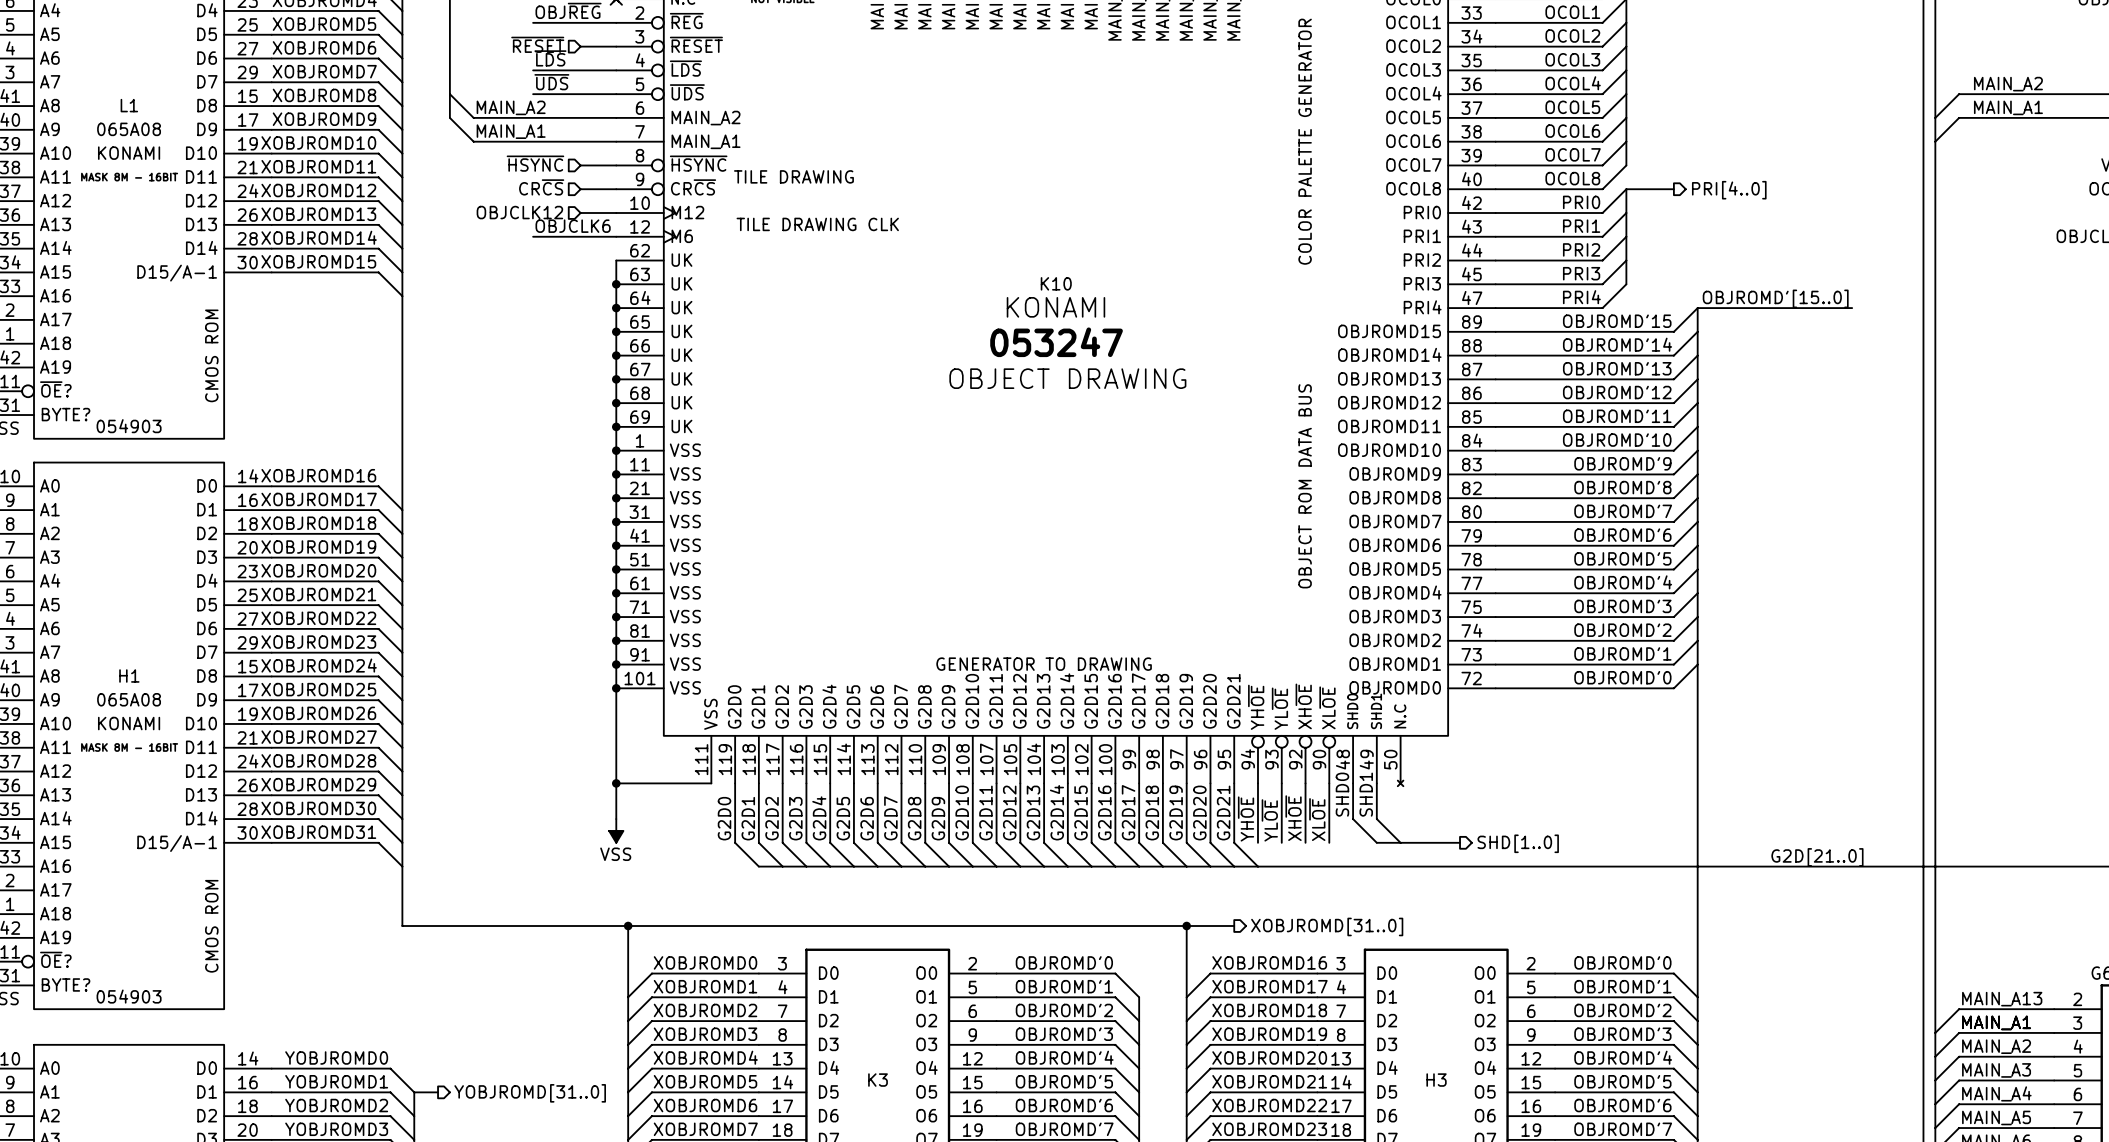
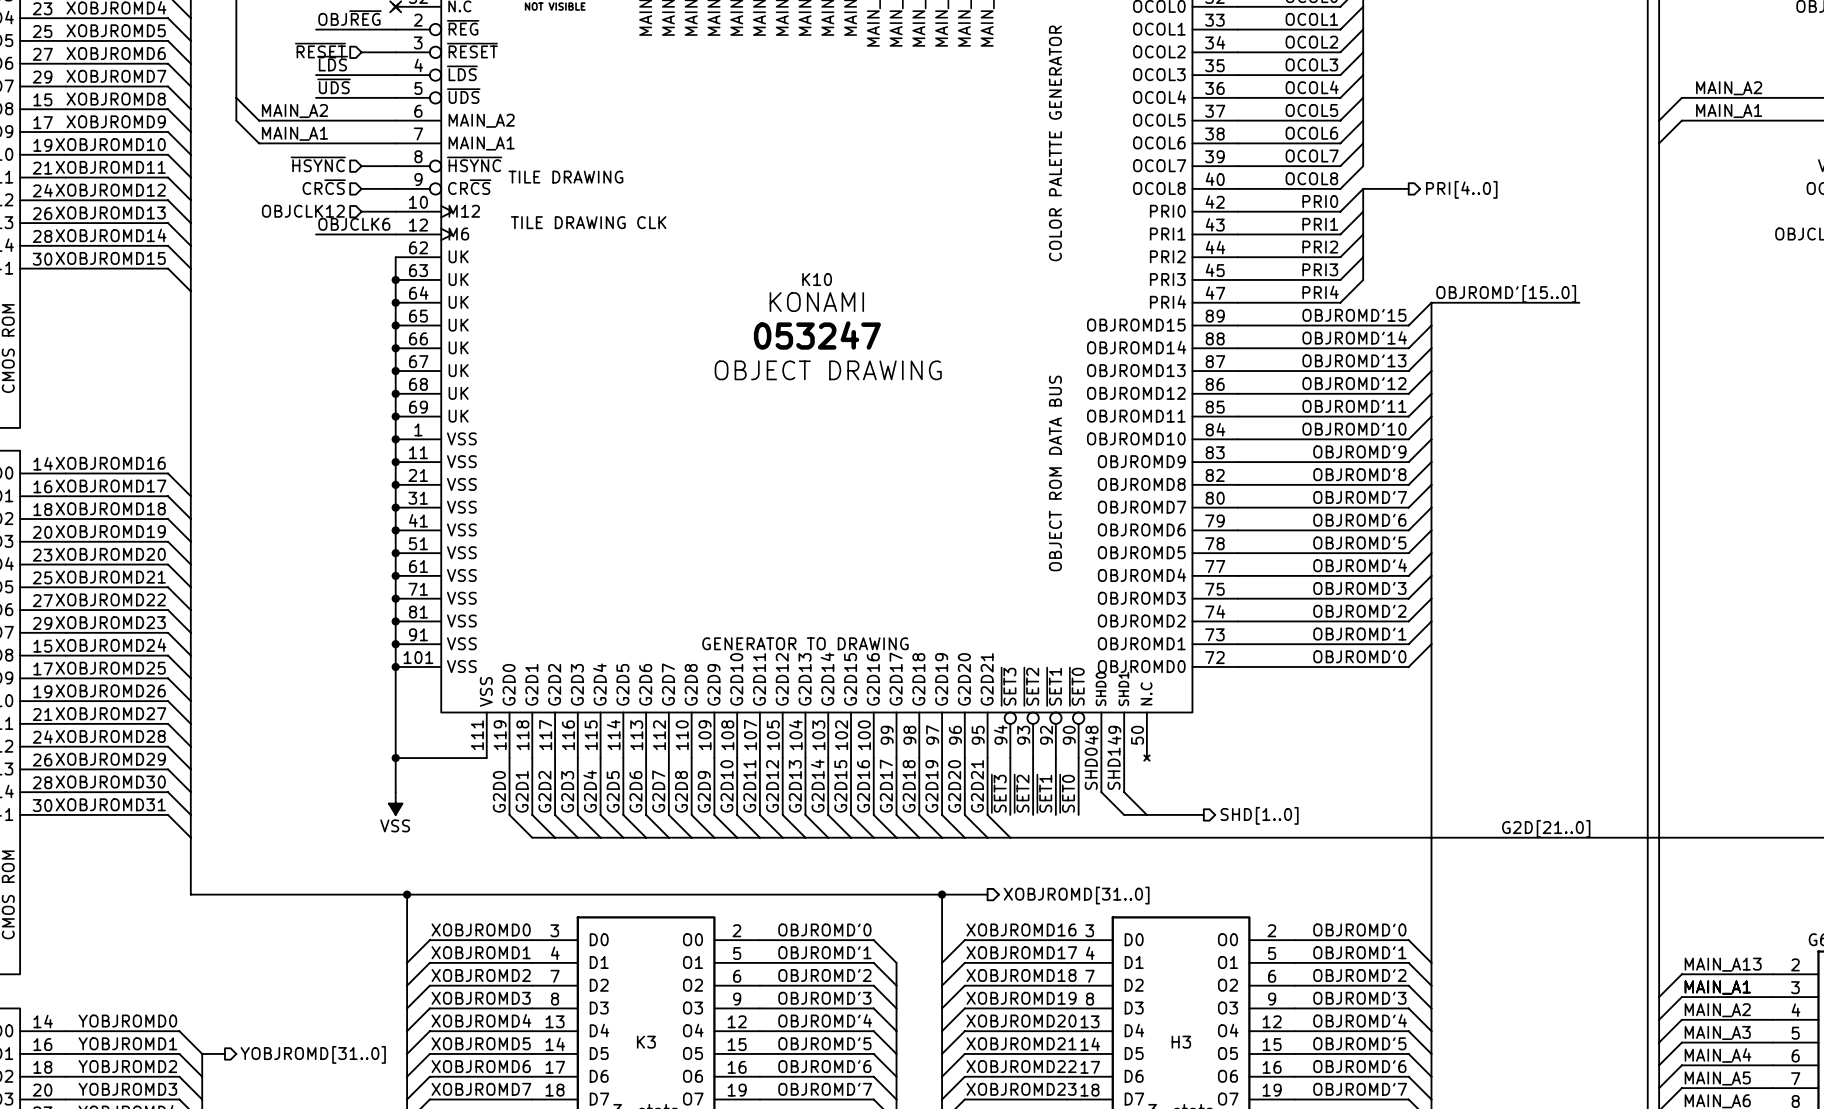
K10 pin name: XH~{OE} (1303, 706) -> ~{SET1} (1054, 686)
K10 pin name: YH~{OE} (1256, 707) -> ~{SET3} (1008, 686)
K10 pin name: XL~{OE} (1327, 707) -> ~{SET0} (1076, 686)
K10 pin name: YL~{OE} (1279, 708) -> ~{SET2} (1031, 686)
label: YH~{OE} (1246, 818) -> ~{SET3} (998, 793)
label: XH~{OE} (1293, 818) -> ~{SET1} (1044, 793)
label: XL~{OE} (1317, 819) -> ~{SET0} (1067, 793)
label: YL~{OE} (1269, 820) -> ~{SET2} (1021, 793)

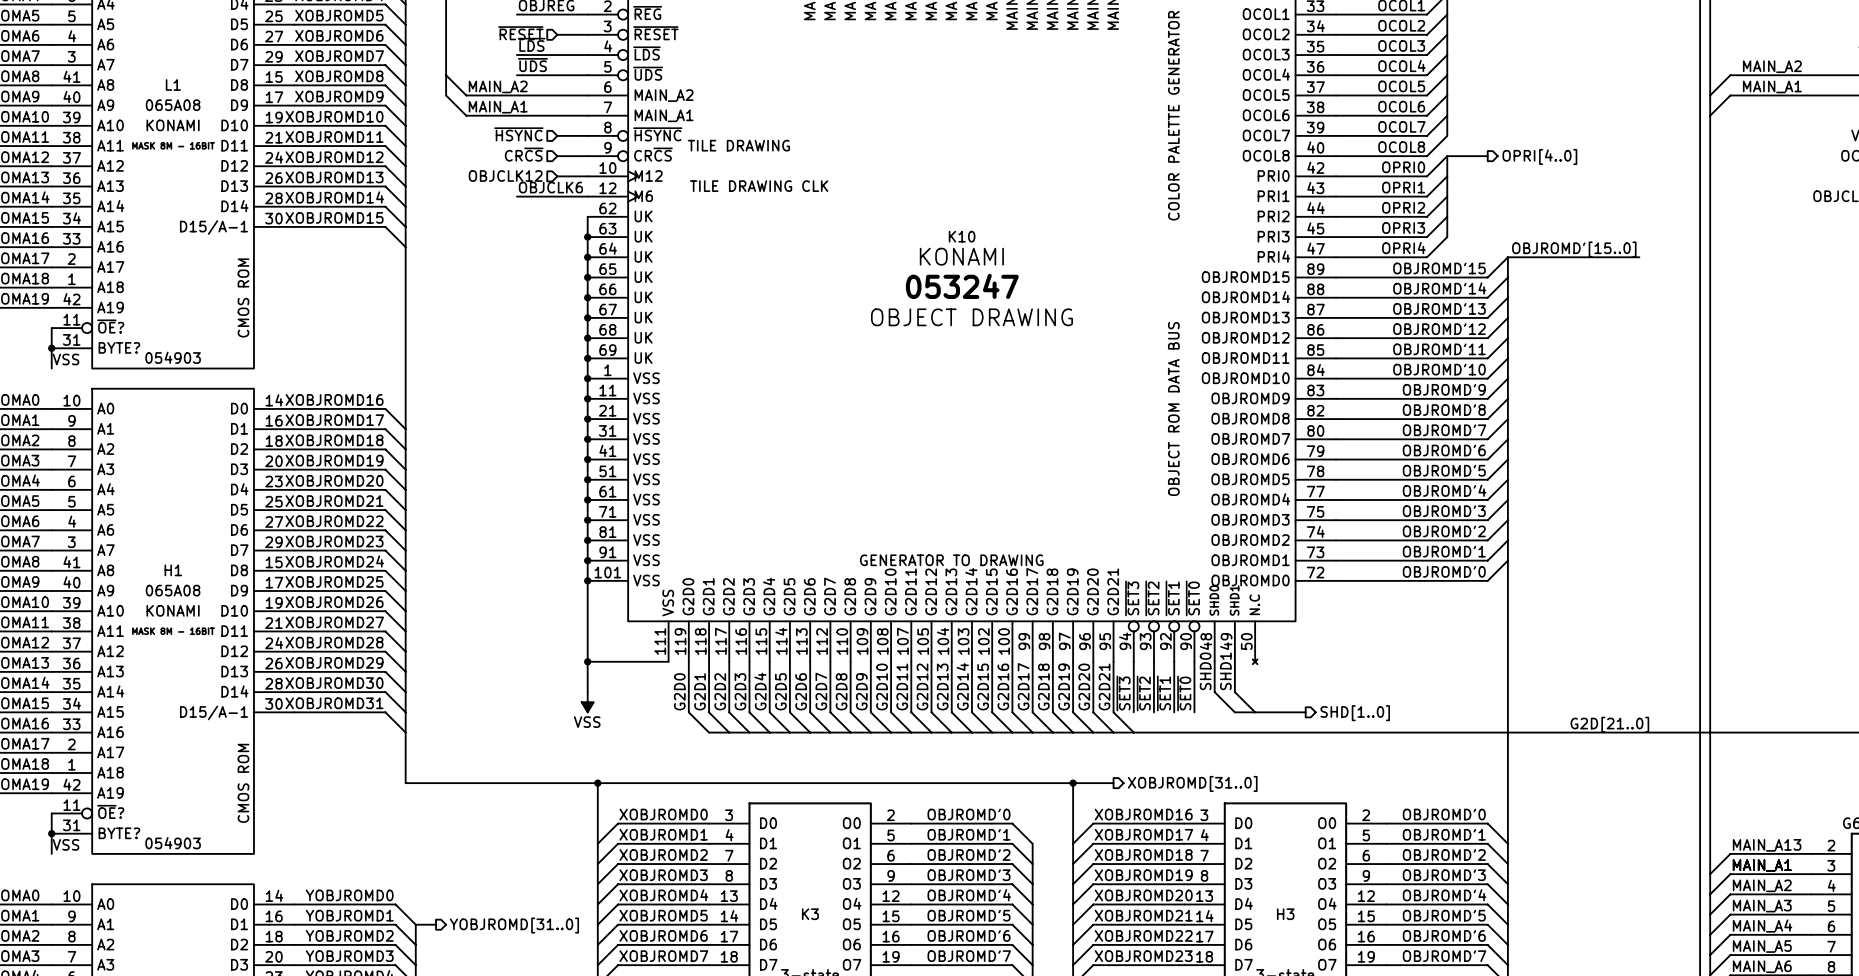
hierarchical label: PRI[4..0] (1461, 189) -> OPRI[4..0] (1539, 156)
label: PRI0 (1320, 201) -> OPRI0 (1403, 167)
label: PRI1 (1320, 224) -> OPRI1 (1403, 187)
label: PRI2 (1320, 247) -> OPRI2 (1403, 207)
label: PRI3 (1320, 269) -> OPRI3 (1403, 228)
label: PRI4 (1320, 292) -> OPRI4 (1403, 248)

